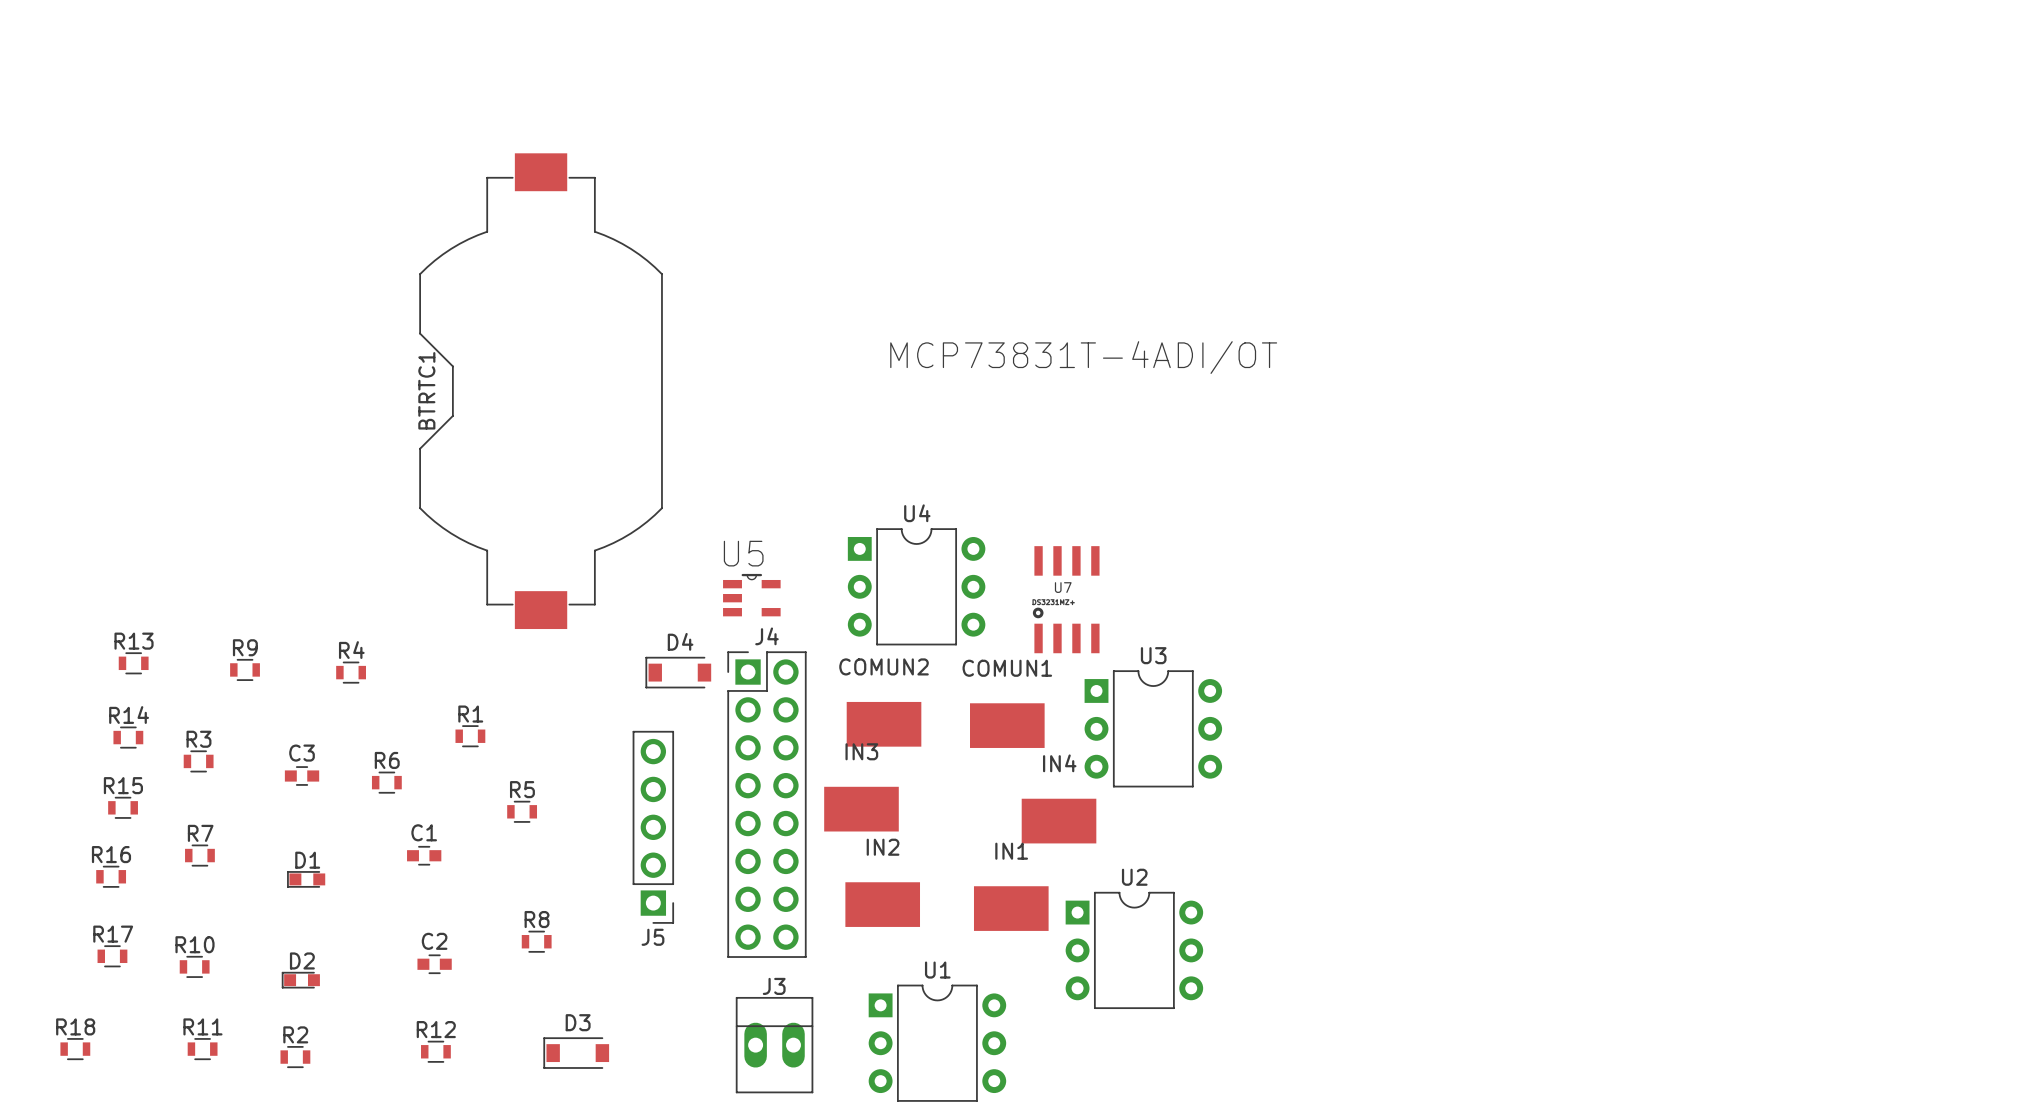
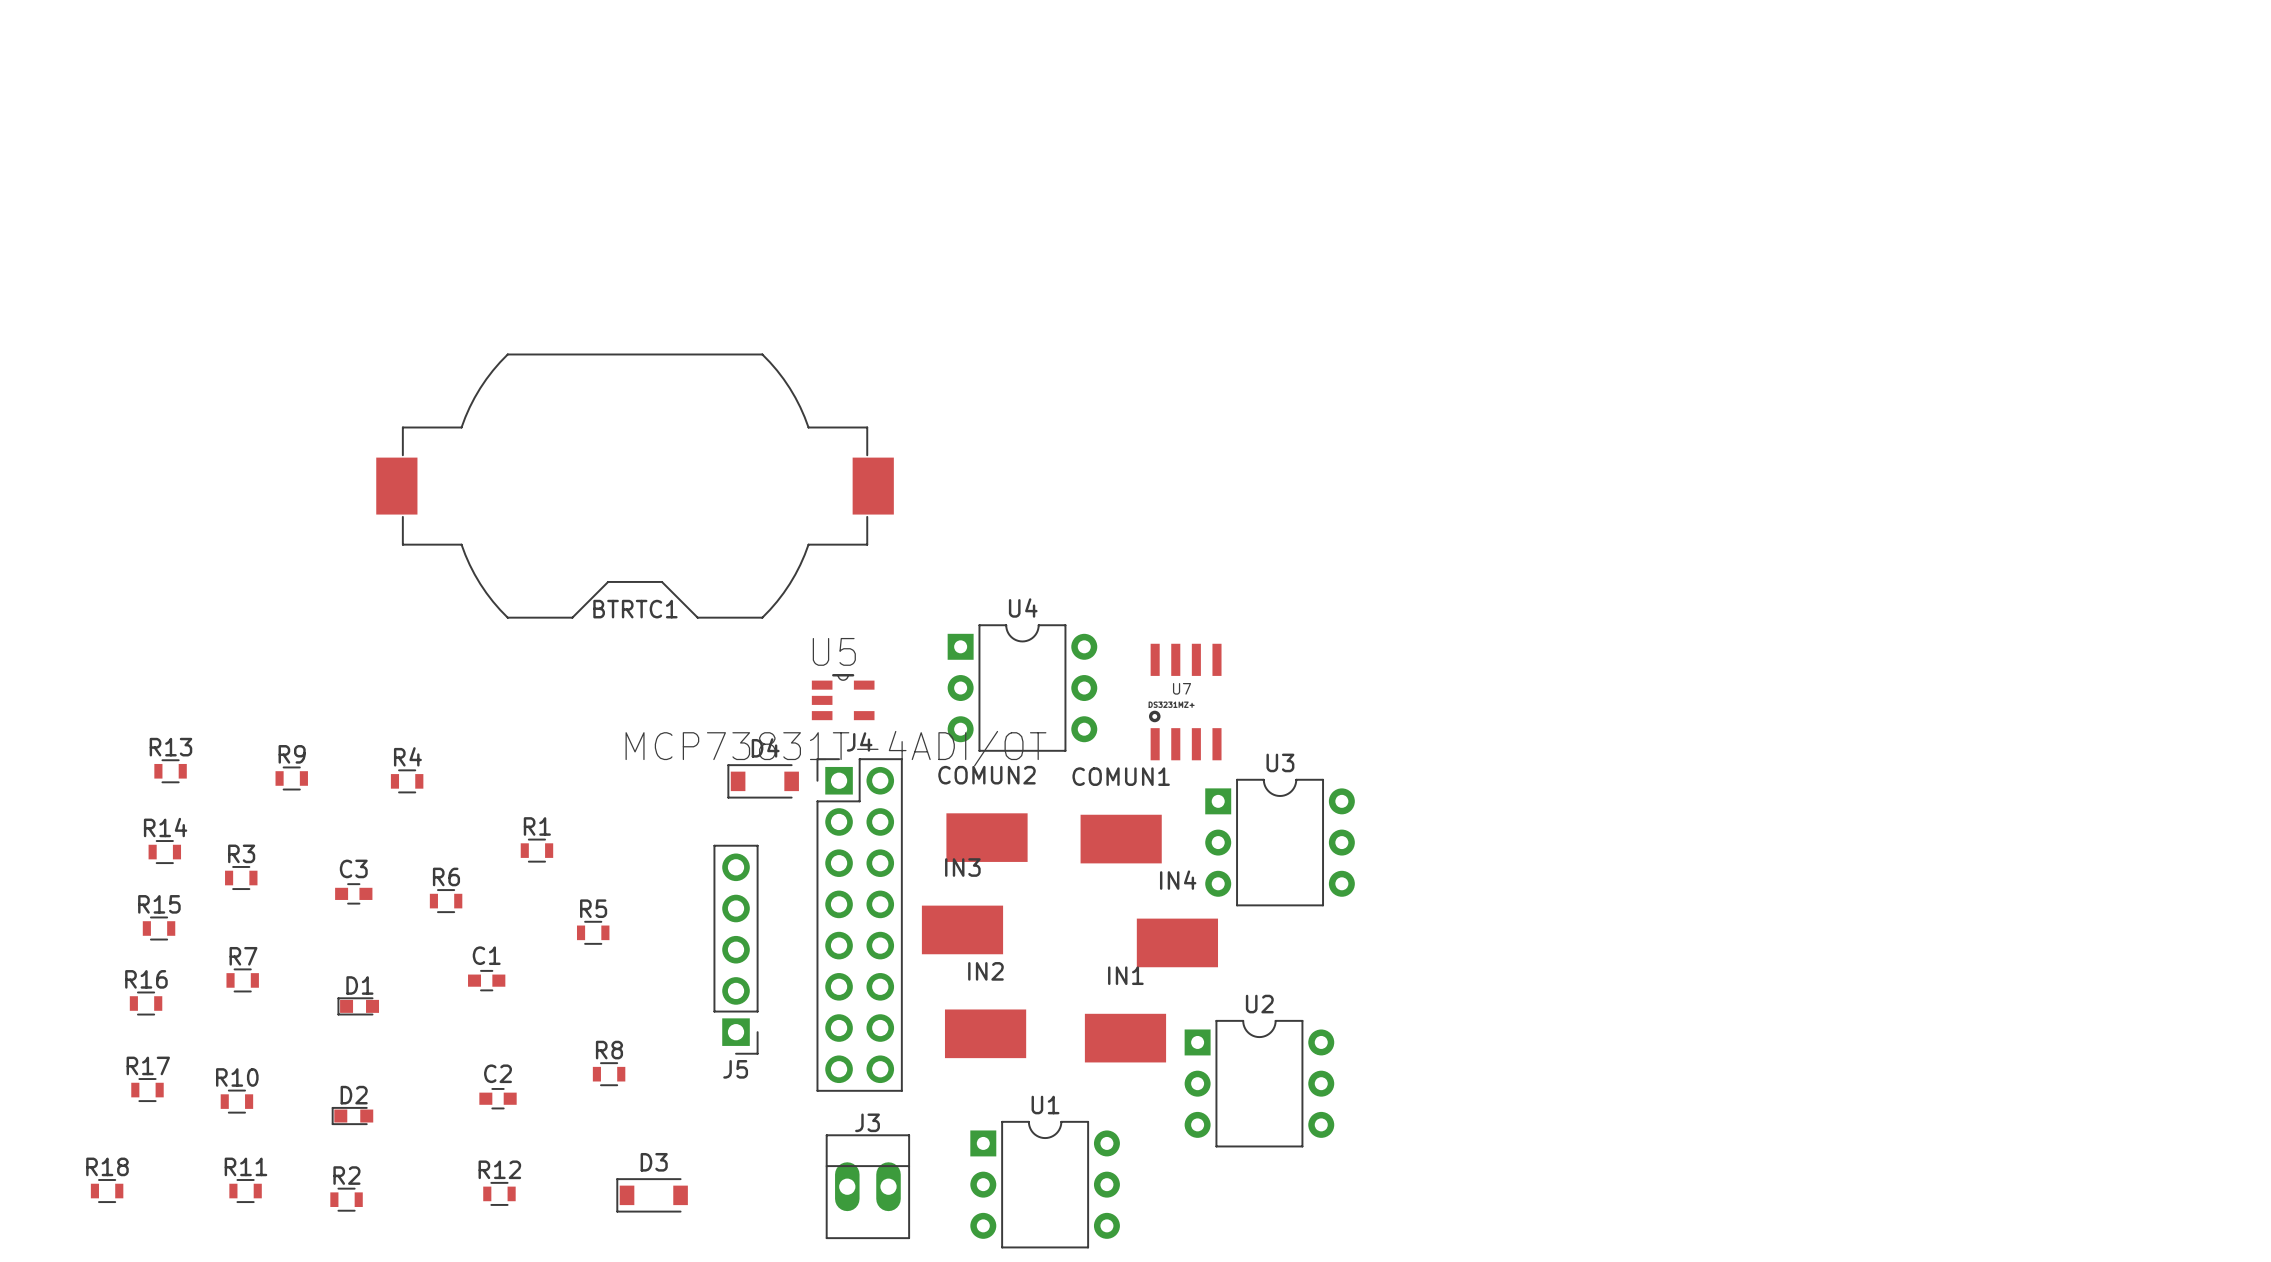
U5 value position: MCP73831T-4ADI/OT (1083, 357) -> MCP73831T-4ADI/OT (835, 748)
BTRTC1 rotation: 0° (541, 391) -> 90° counterclockwise (635, 486)

